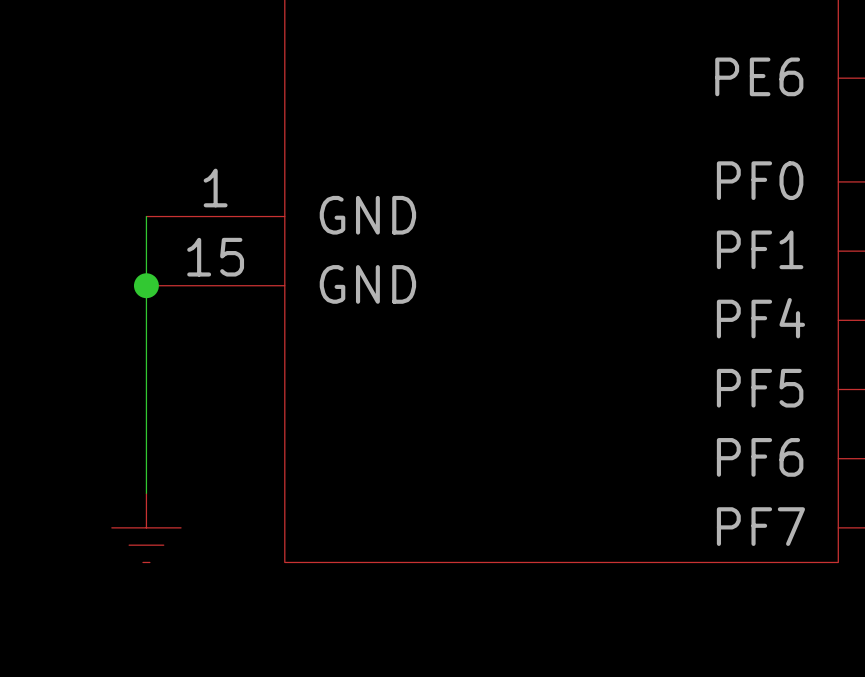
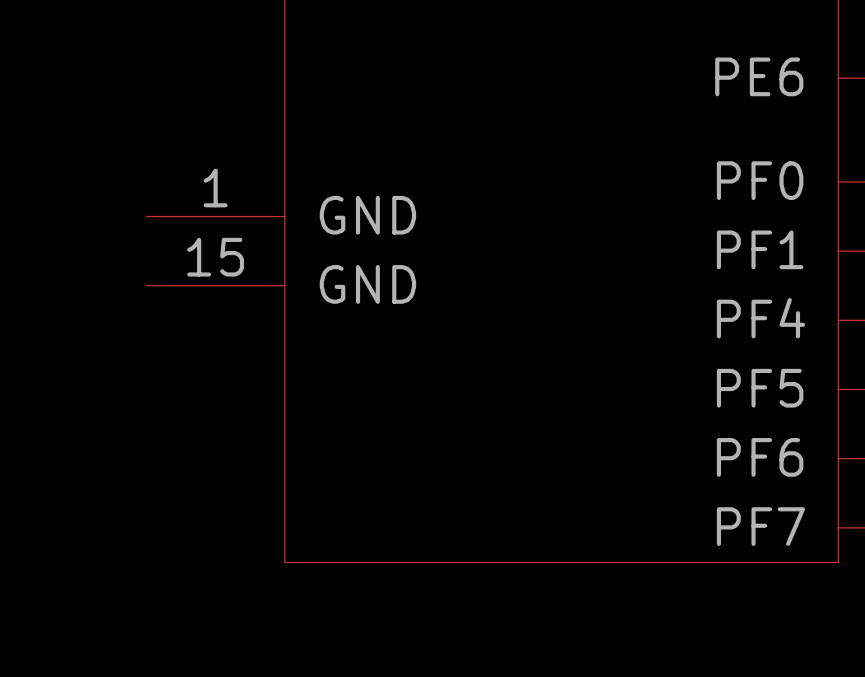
wire: (146, 216) (146, 493) -> none
junction: (146, 285) -> none
power symbol: (146, 527) -> none

